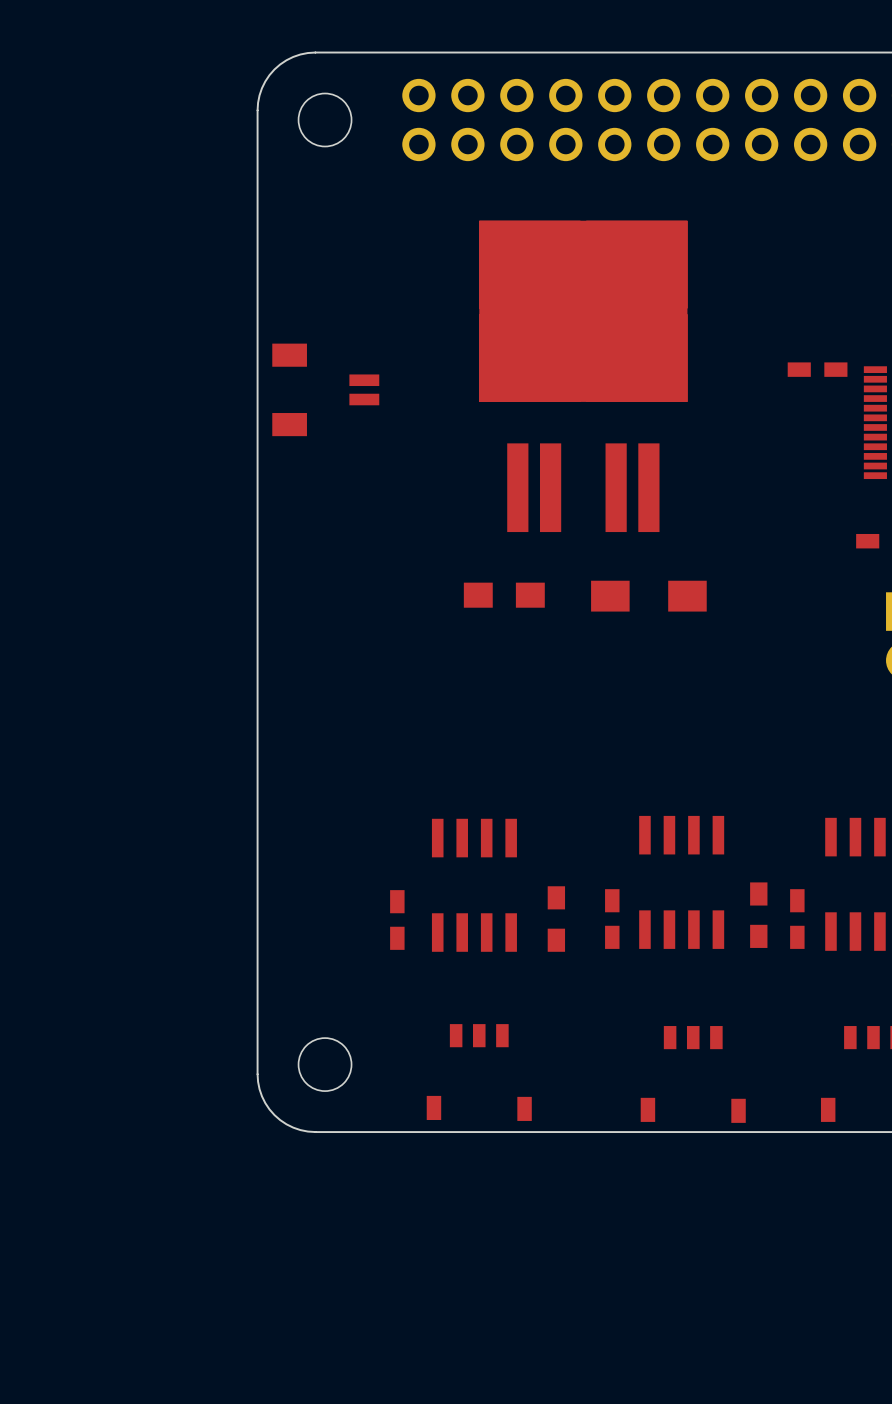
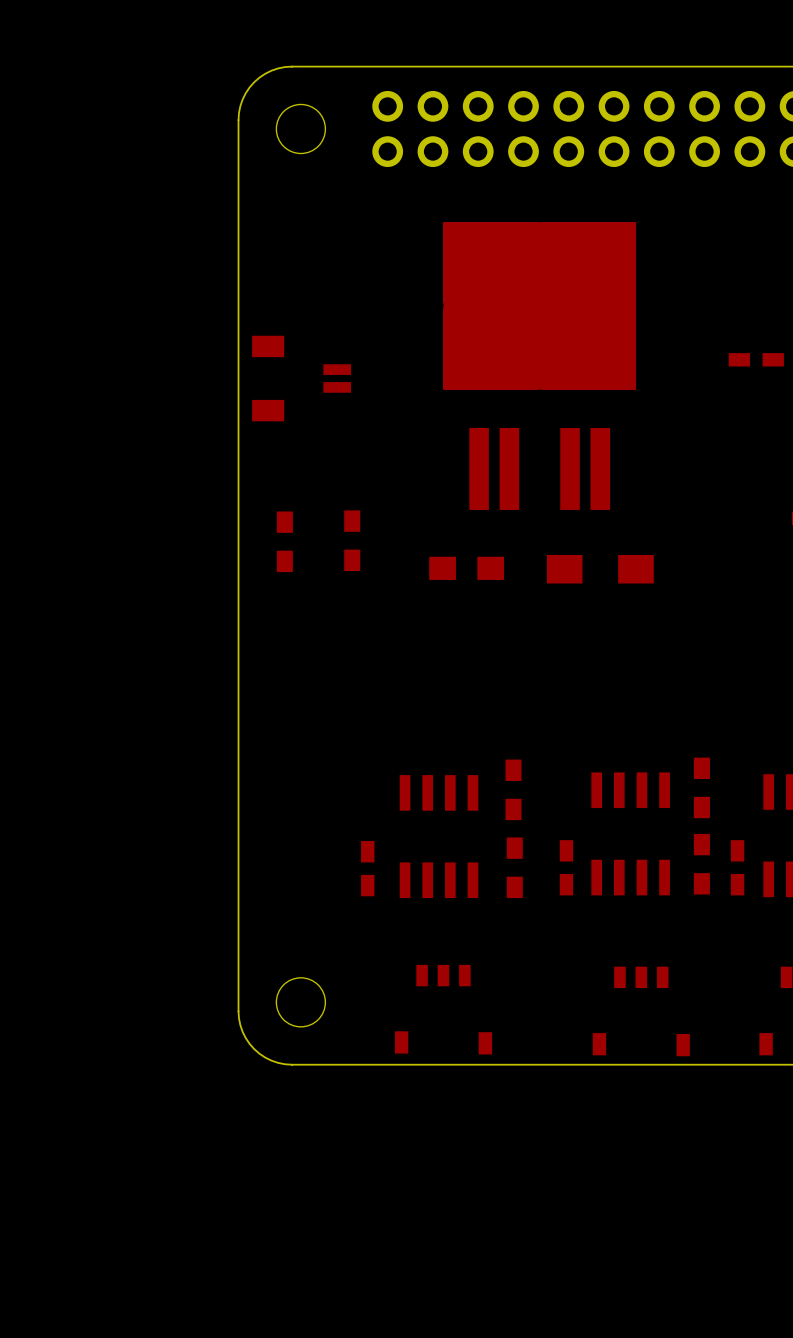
part: none -> (352, 540)
part: none -> (284, 541)
part: none -> (701, 787)
part: none -> (513, 789)

